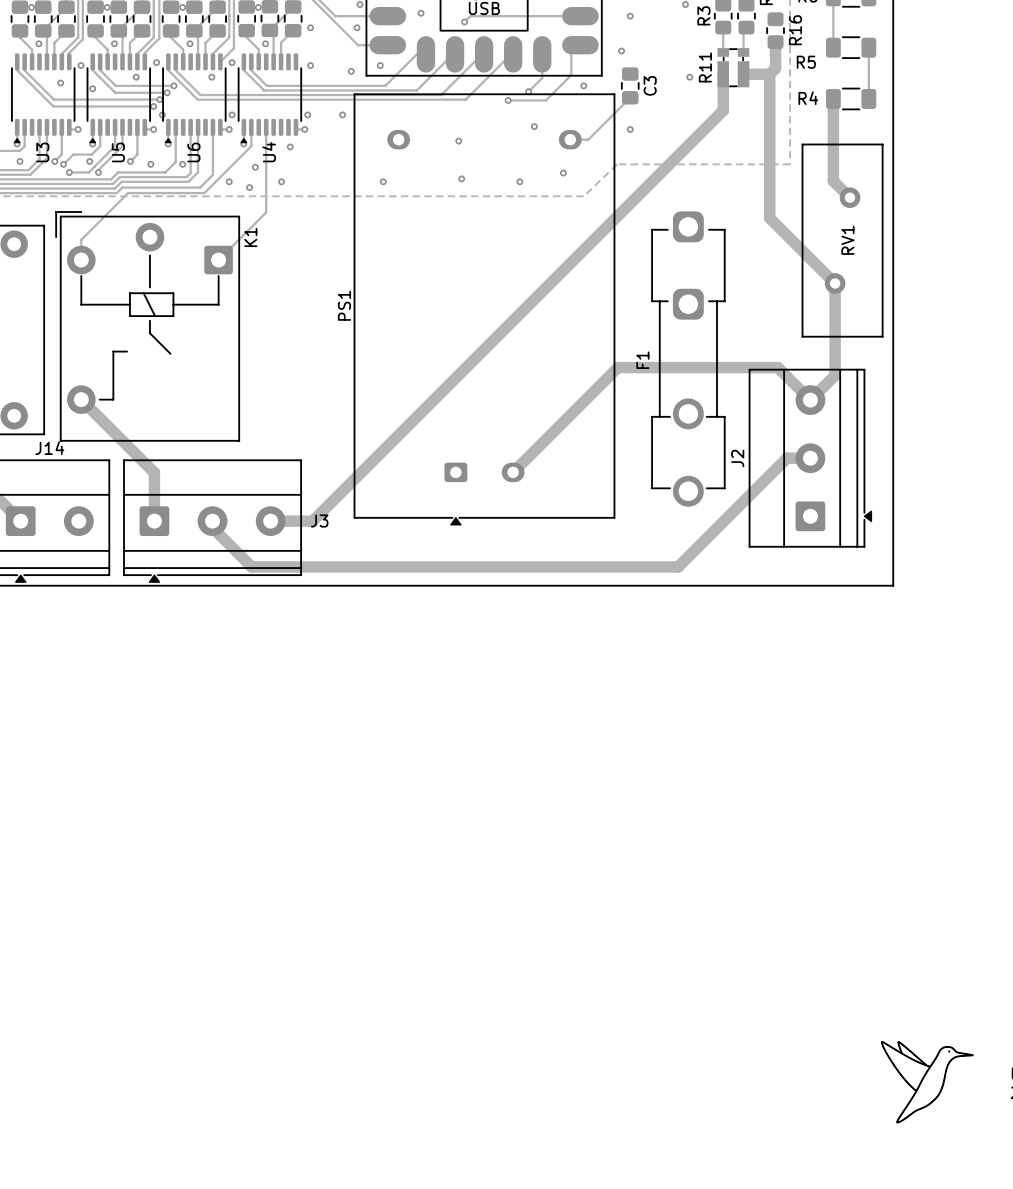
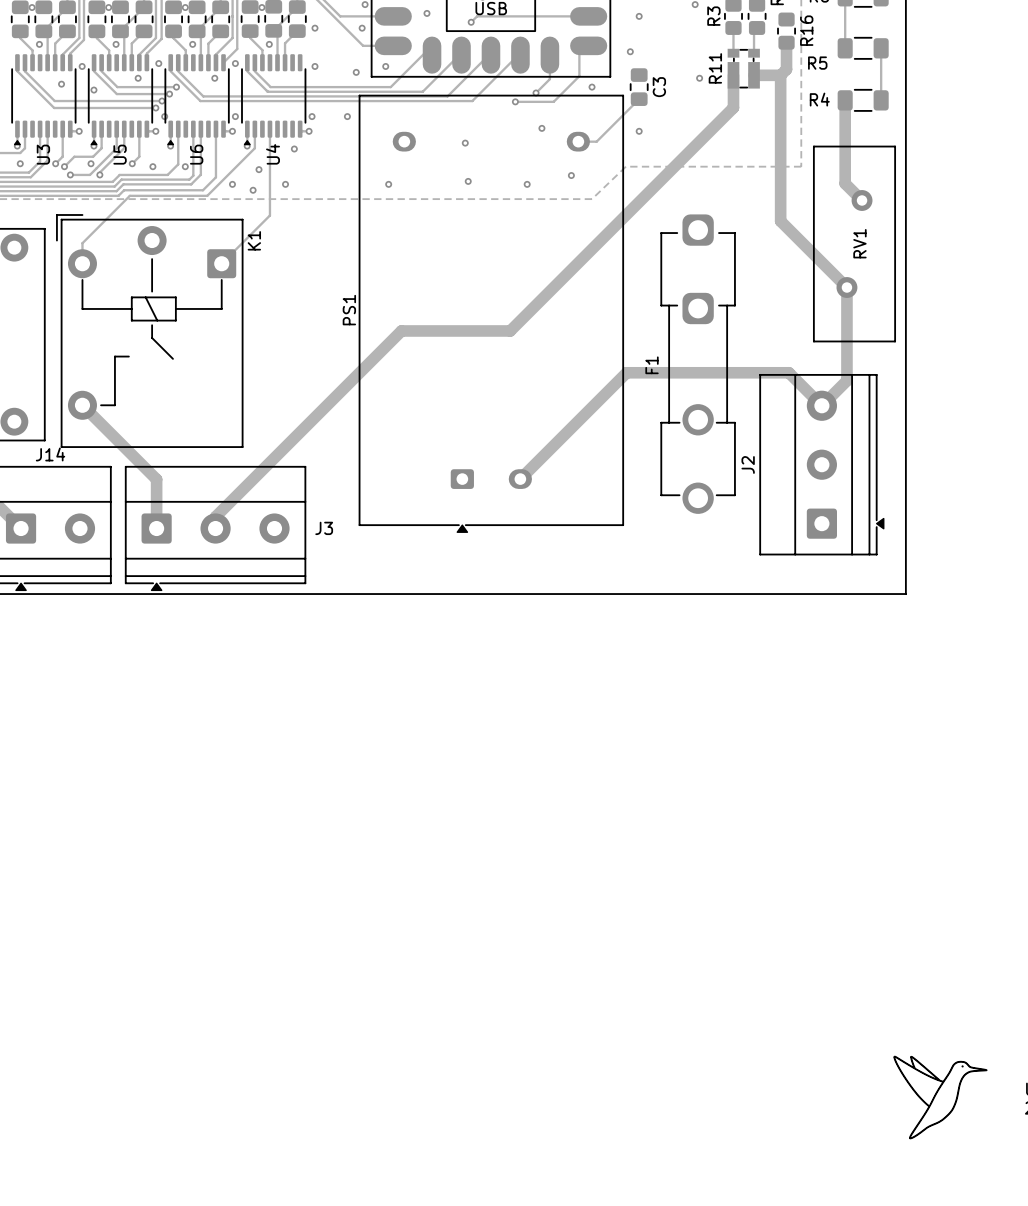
track: (723, 106) (723, 110) (312, 521) (270, 521) -> (733, 107) (510, 330) (401, 330) (215, 516) (215, 528)
track: (810, 458) (786, 458) (678, 566) (251, 566) (212, 527) (212, 521) -> none

